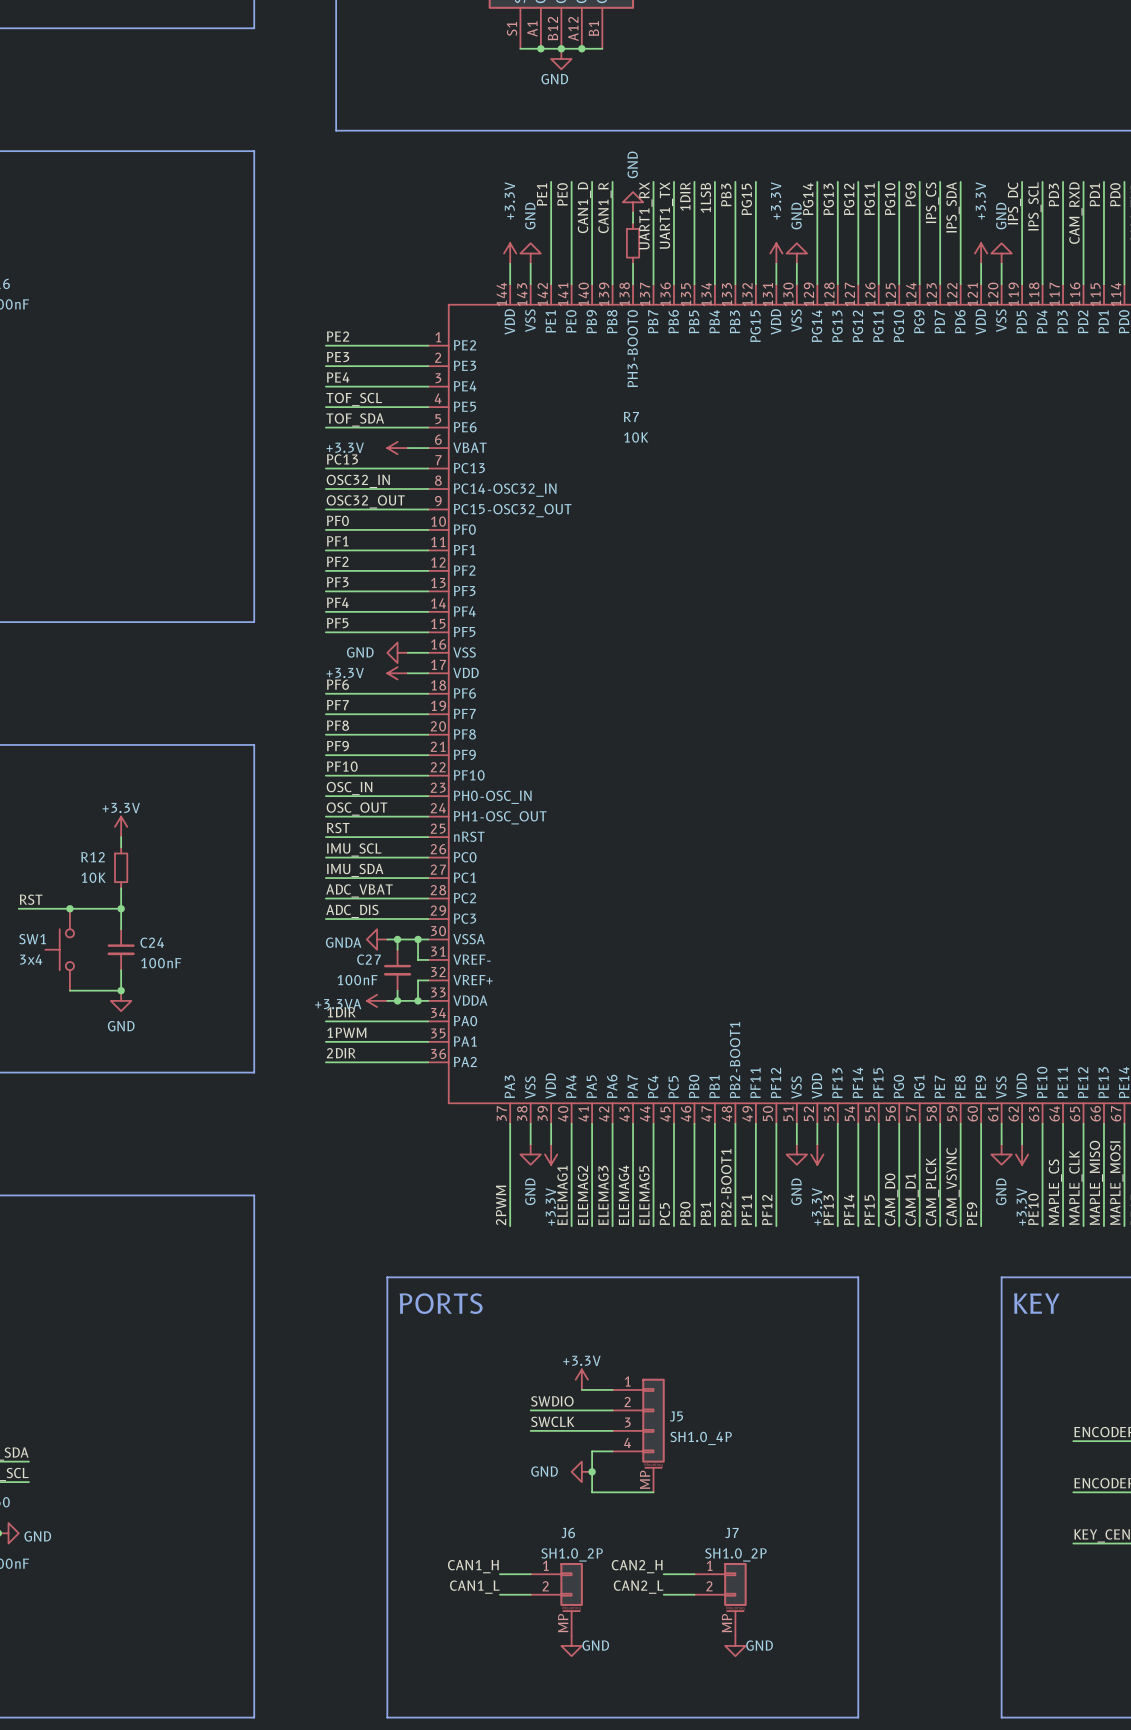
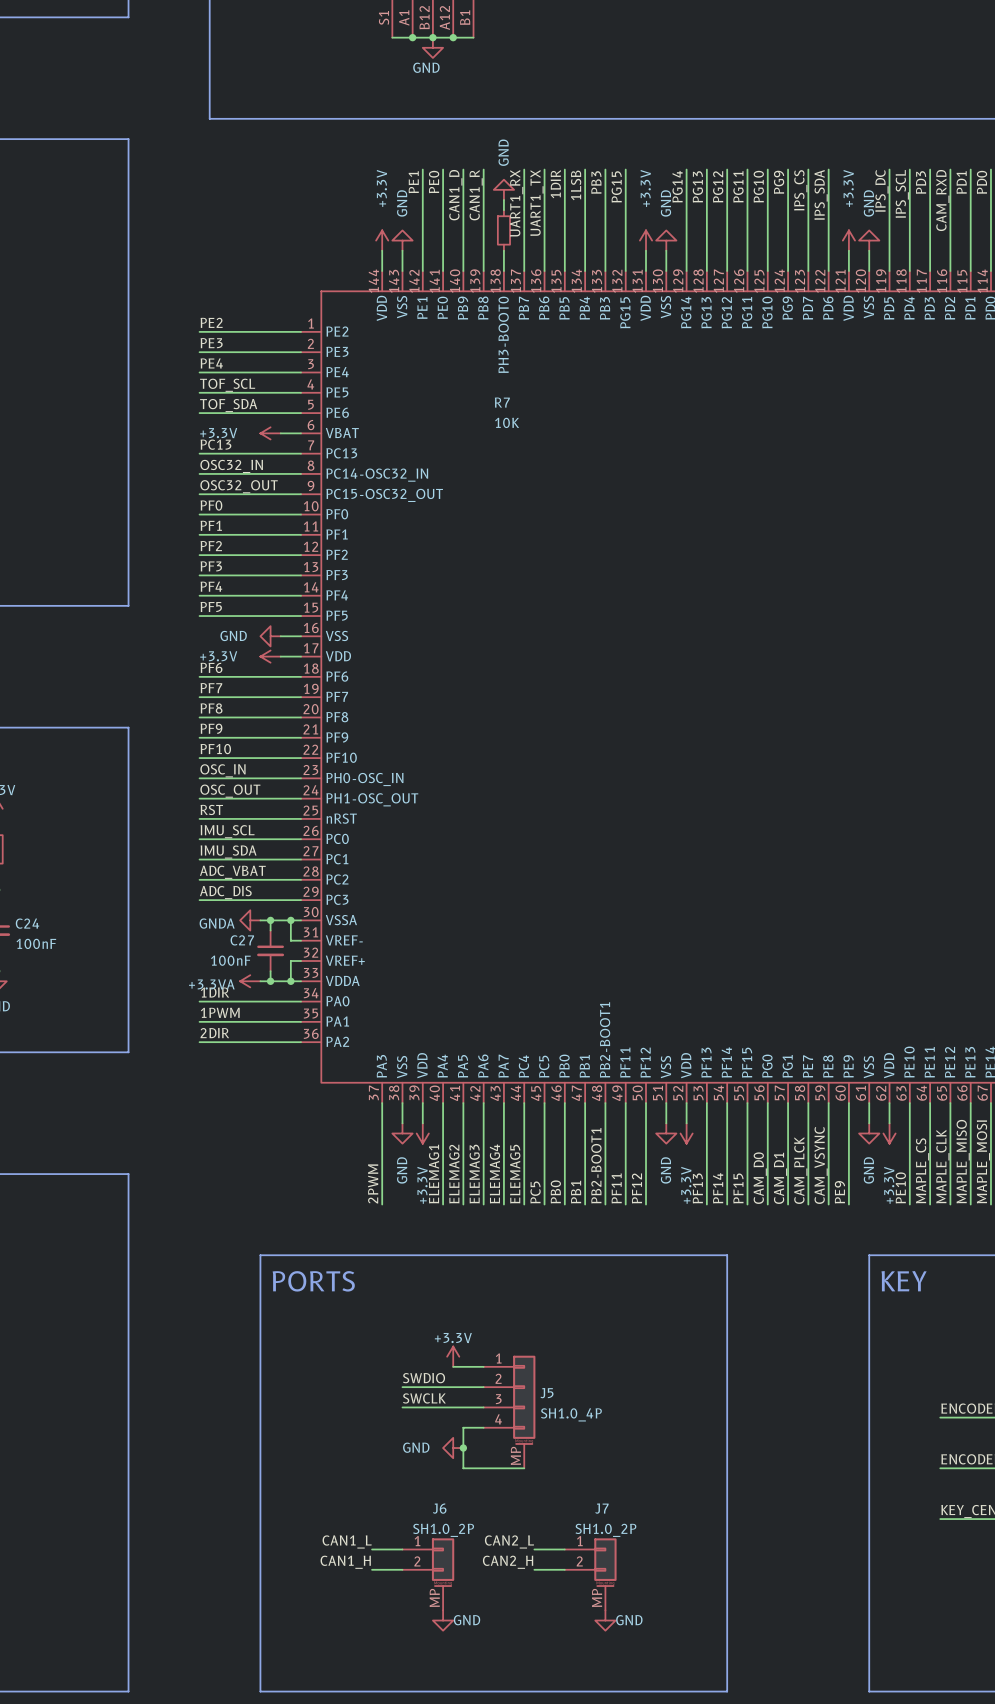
label: CAN1_H (473, 1566) -> CAN1_L (347, 1541)
label: CAN2_H (637, 1566) -> CAN2_L (509, 1541)
label: CAN1_L (474, 1587) -> CAN1_H (345, 1562)
label: CAN2_L (638, 1587) -> CAN2_H (508, 1562)

